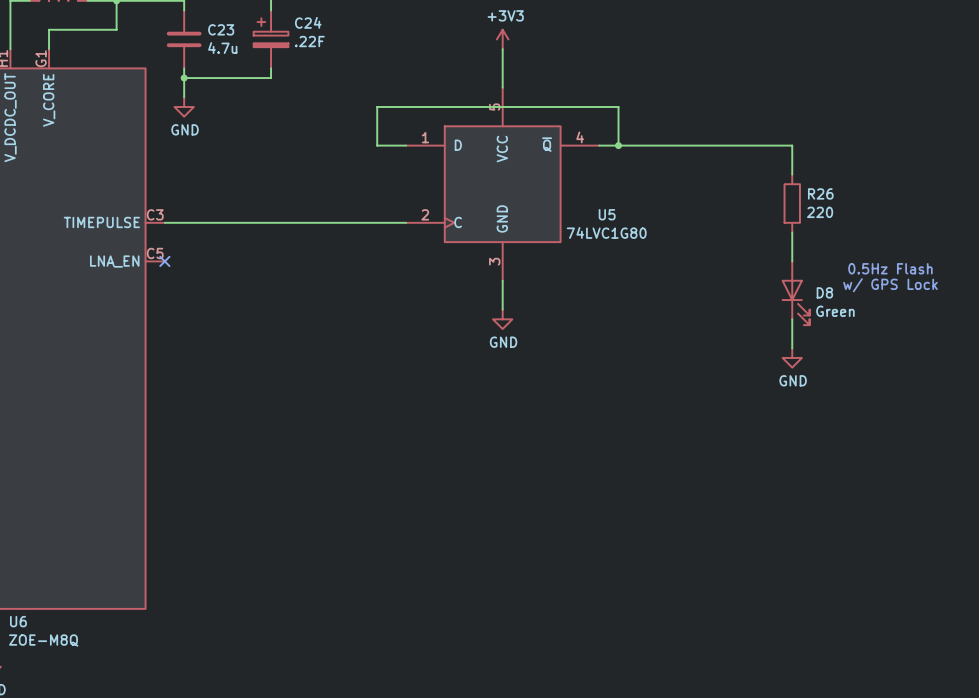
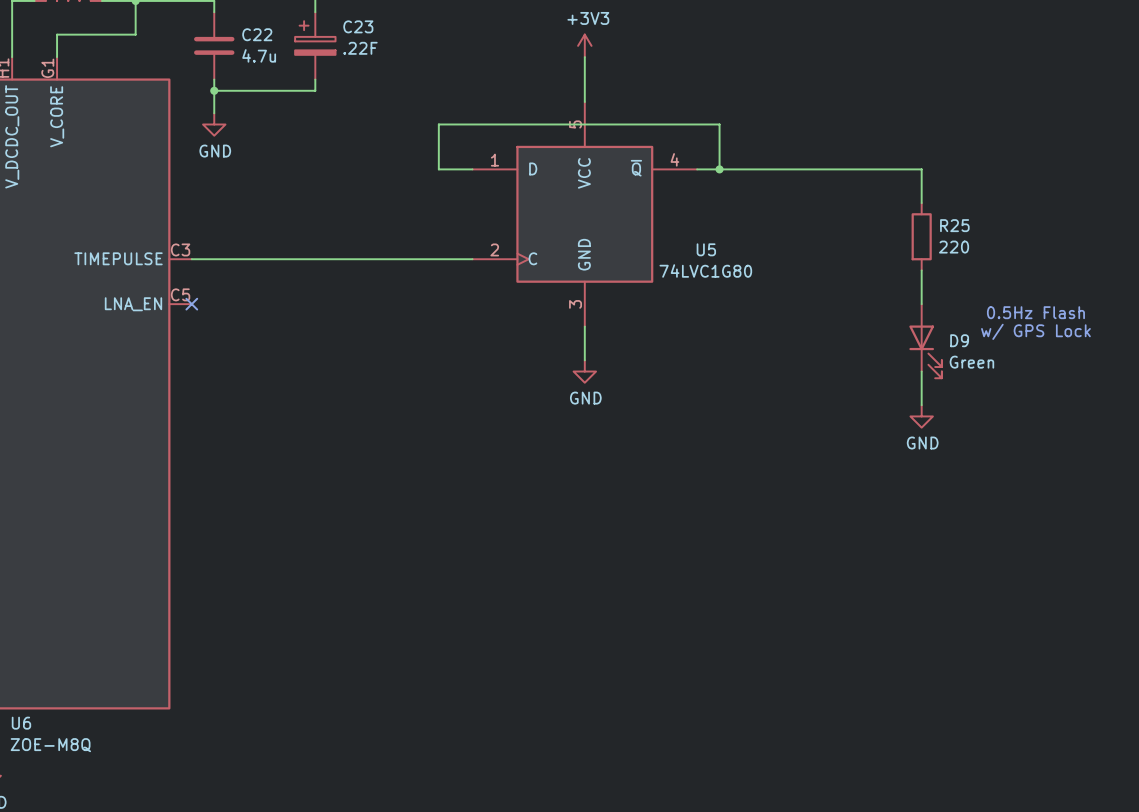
C24 name: C24 (308, 22) -> C23 (358, 26)
C23 name: C23 (221, 29) -> C22 (257, 34)
R26 name: R26 (820, 193) -> R25 (954, 225)
D8 name: D8 (824, 292) -> D9 (959, 340)

